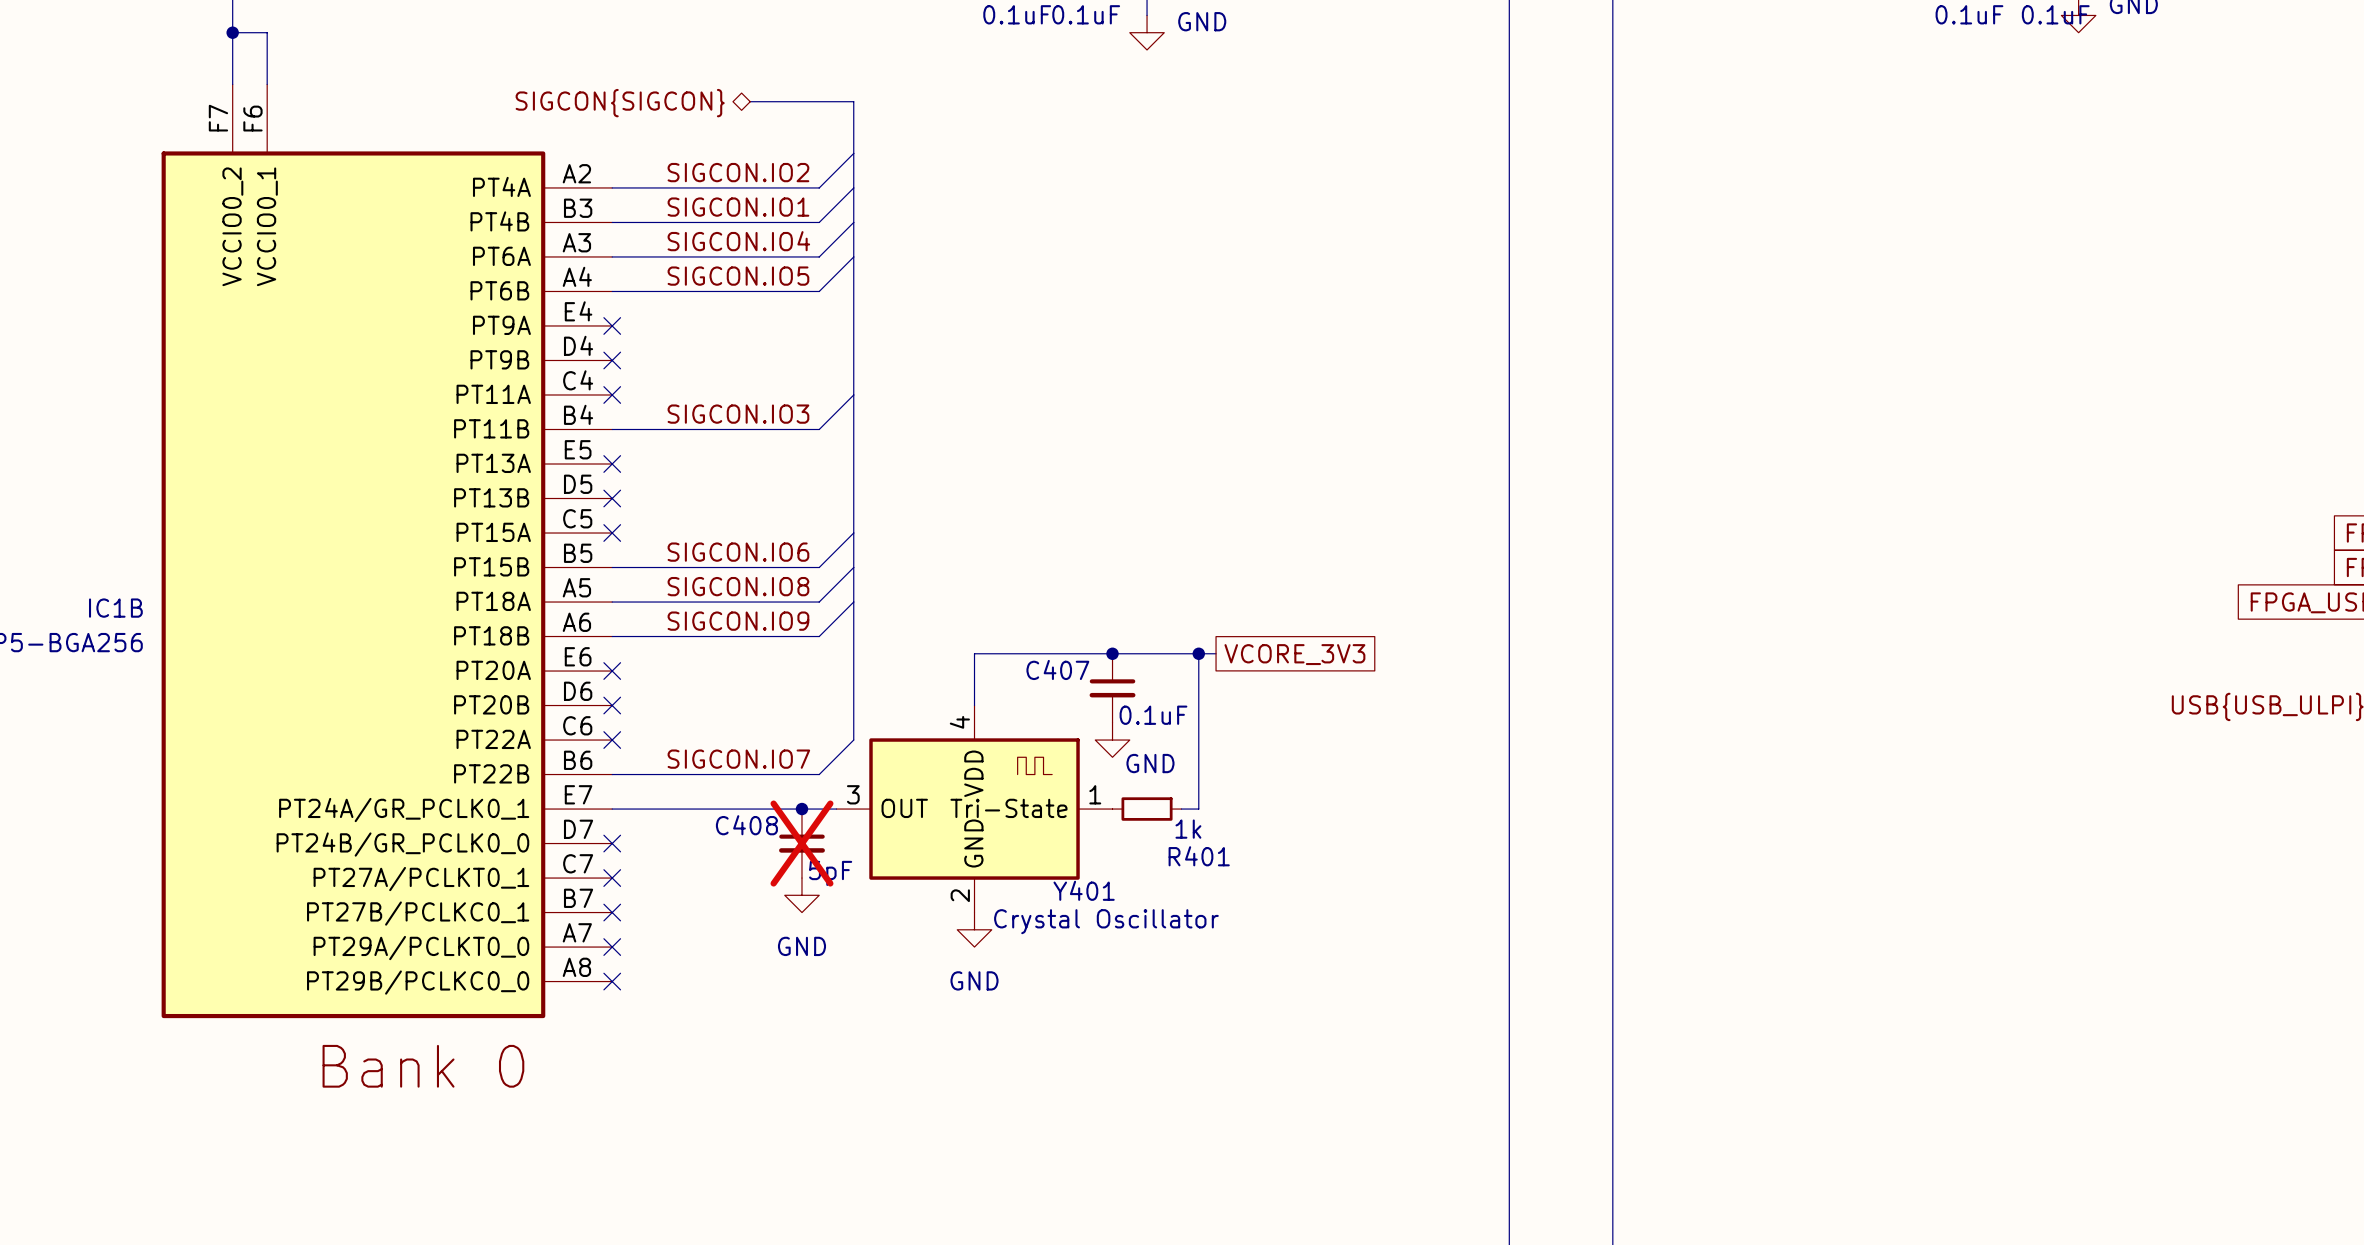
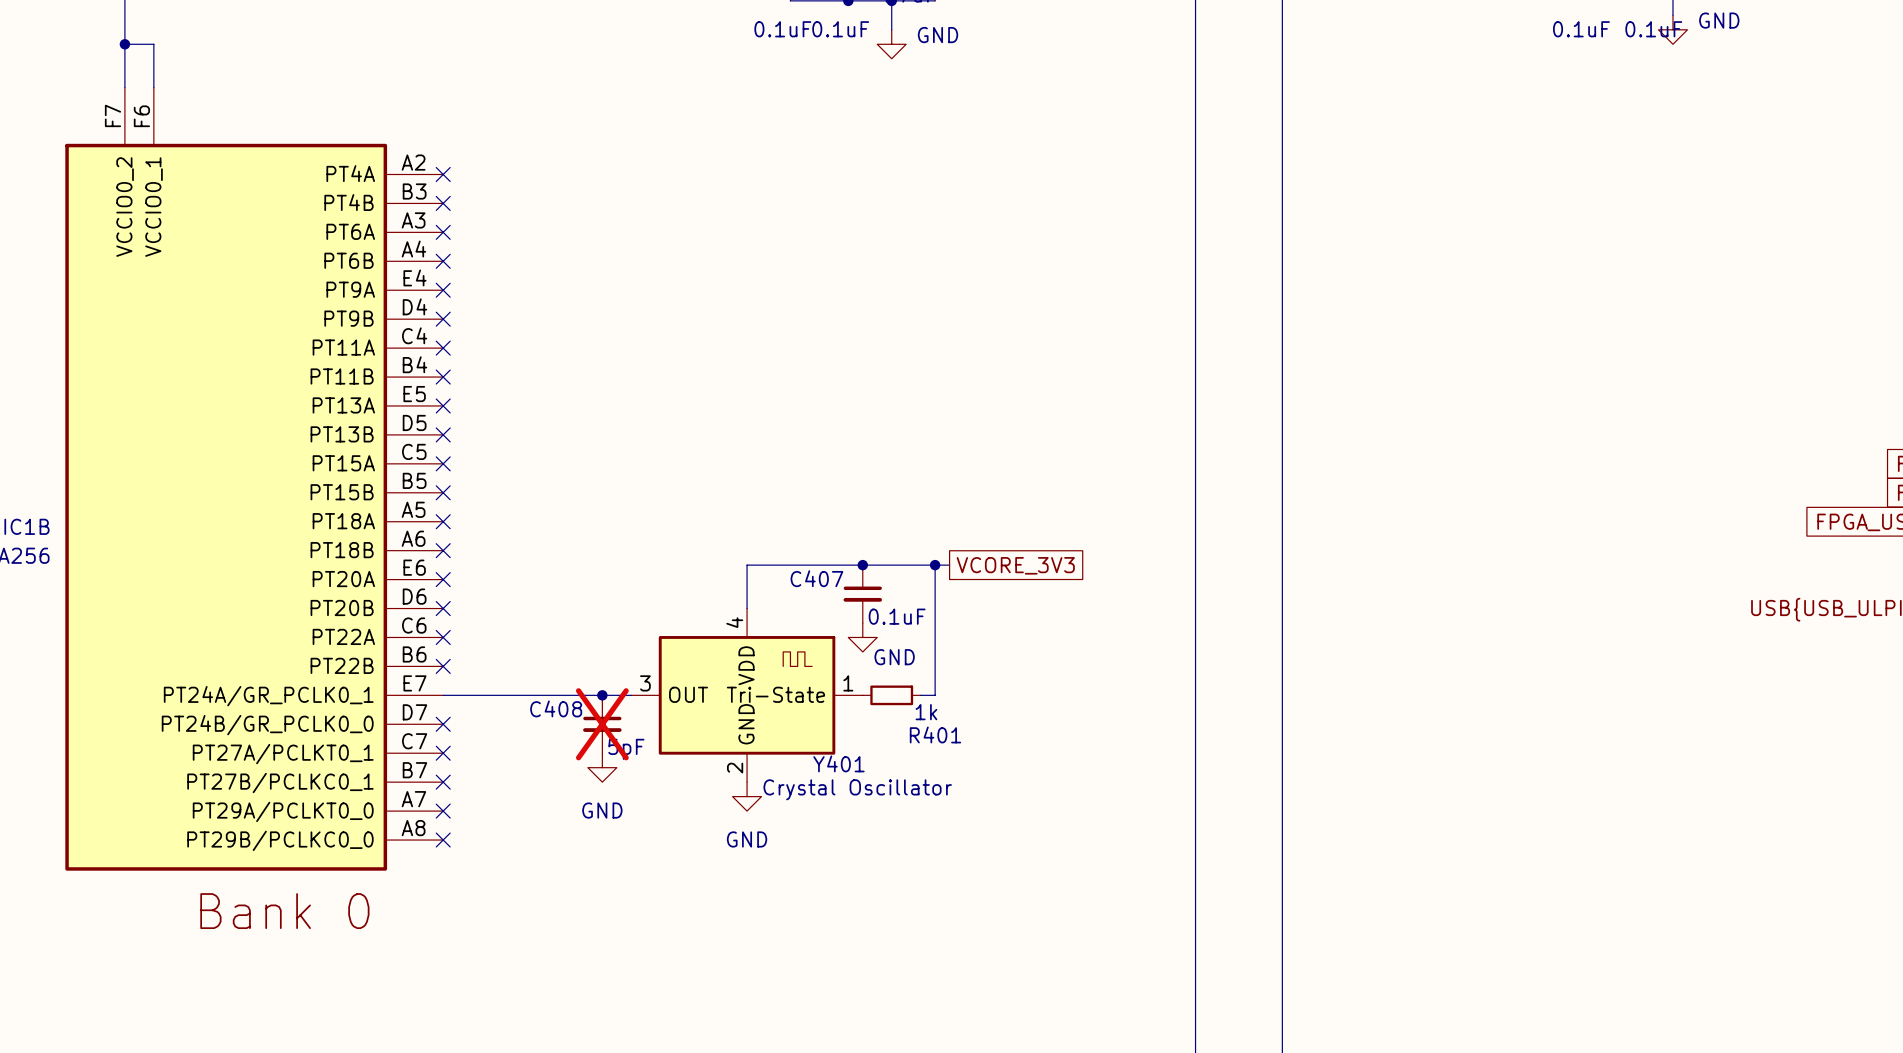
bus: (750, 101) (853, 101) (853, 740) -> none
hierarchical label: SIGCON{SIGCON} (620, 103) -> none
wire: (853, 153) (819, 187) (612, 187) -> none
label: SIGCON.IO2 (738, 172) -> none
no-connect mark: none -> (443, 174)
wire: (853, 187) (819, 222) (612, 222) -> none
label: SIGCON.IO1 (738, 207) -> none
no-connect mark: none -> (443, 203)
wire: (853, 222) (819, 256) (612, 256) -> none
label: SIGCON.IO4 (738, 241) -> none
no-connect mark: none -> (443, 232)
wire: (853, 256) (819, 291) (612, 291) -> none
label: SIGCON.IO5 (738, 276) -> none
no-connect mark: none -> (443, 261)
wire: (853, 394) (819, 429) (612, 429) -> none
label: SIGCON.IO3 (738, 414) -> none
no-connect mark: none -> (443, 377)
wire: (853, 533) (819, 567) (612, 567) -> none
label: SIGCON.IO6 (738, 552) -> none
no-connect mark: none -> (443, 492)
wire: (853, 567) (819, 602) (612, 602) -> none
label: SIGCON.IO8 (738, 586) -> none
no-connect mark: none -> (443, 521)
wire: (853, 602) (819, 636) (612, 636) -> none
label: SIGCON.IO9 (738, 621) -> none
no-connect mark: none -> (443, 550)
wire: (853, 740) (819, 774) (612, 774) -> none
label: SIGCON.IO7 (738, 759) -> none
no-connect mark: none -> (443, 666)

